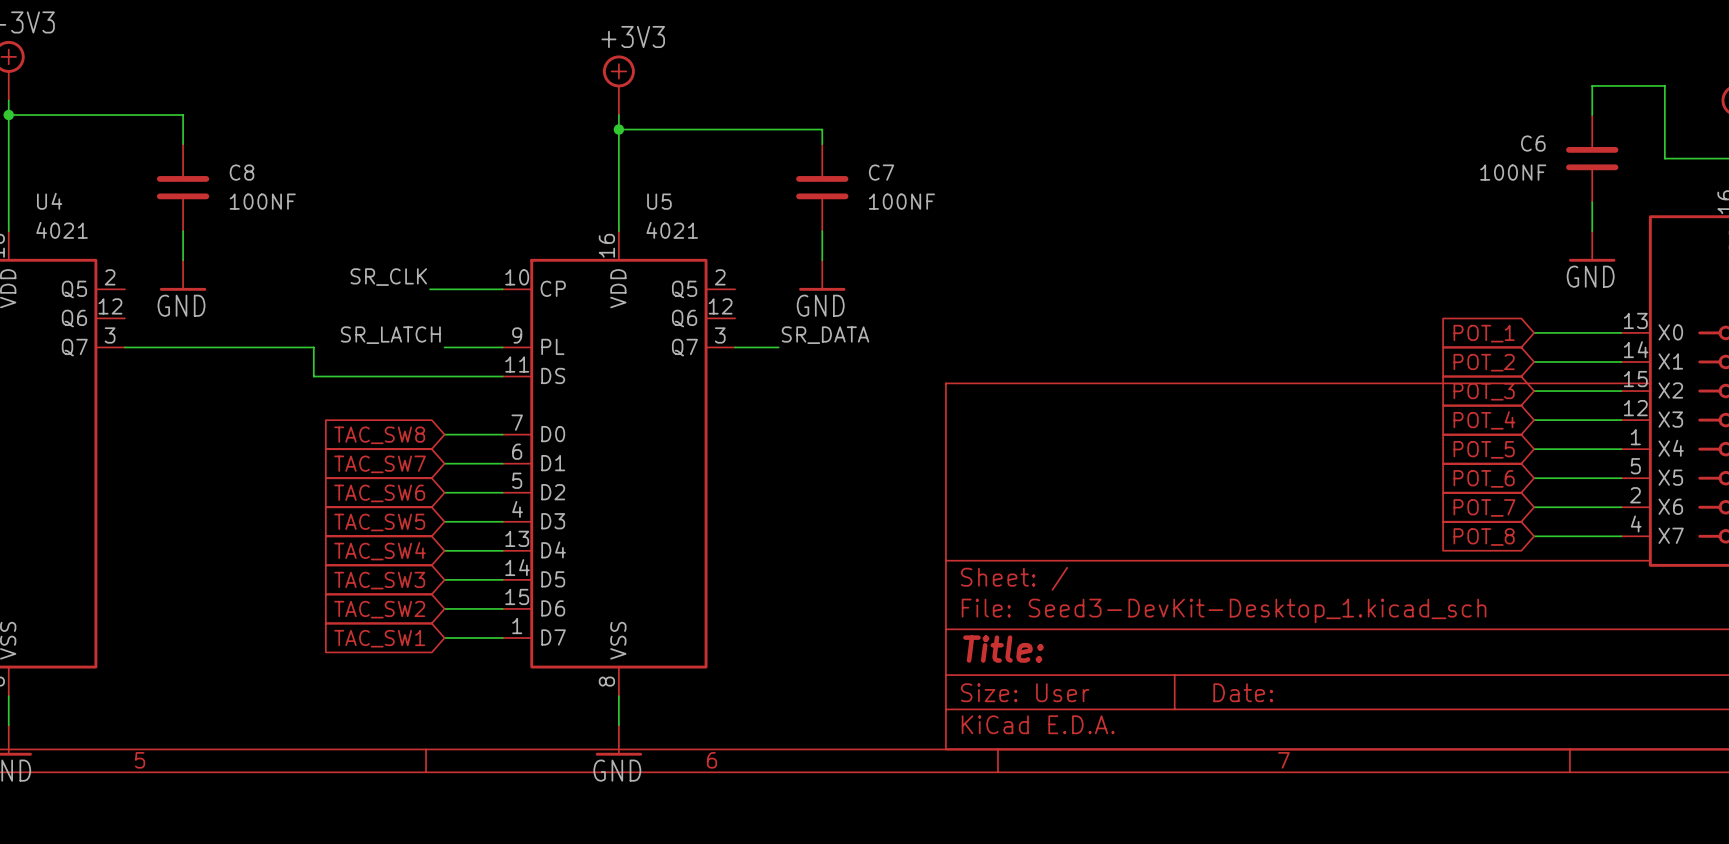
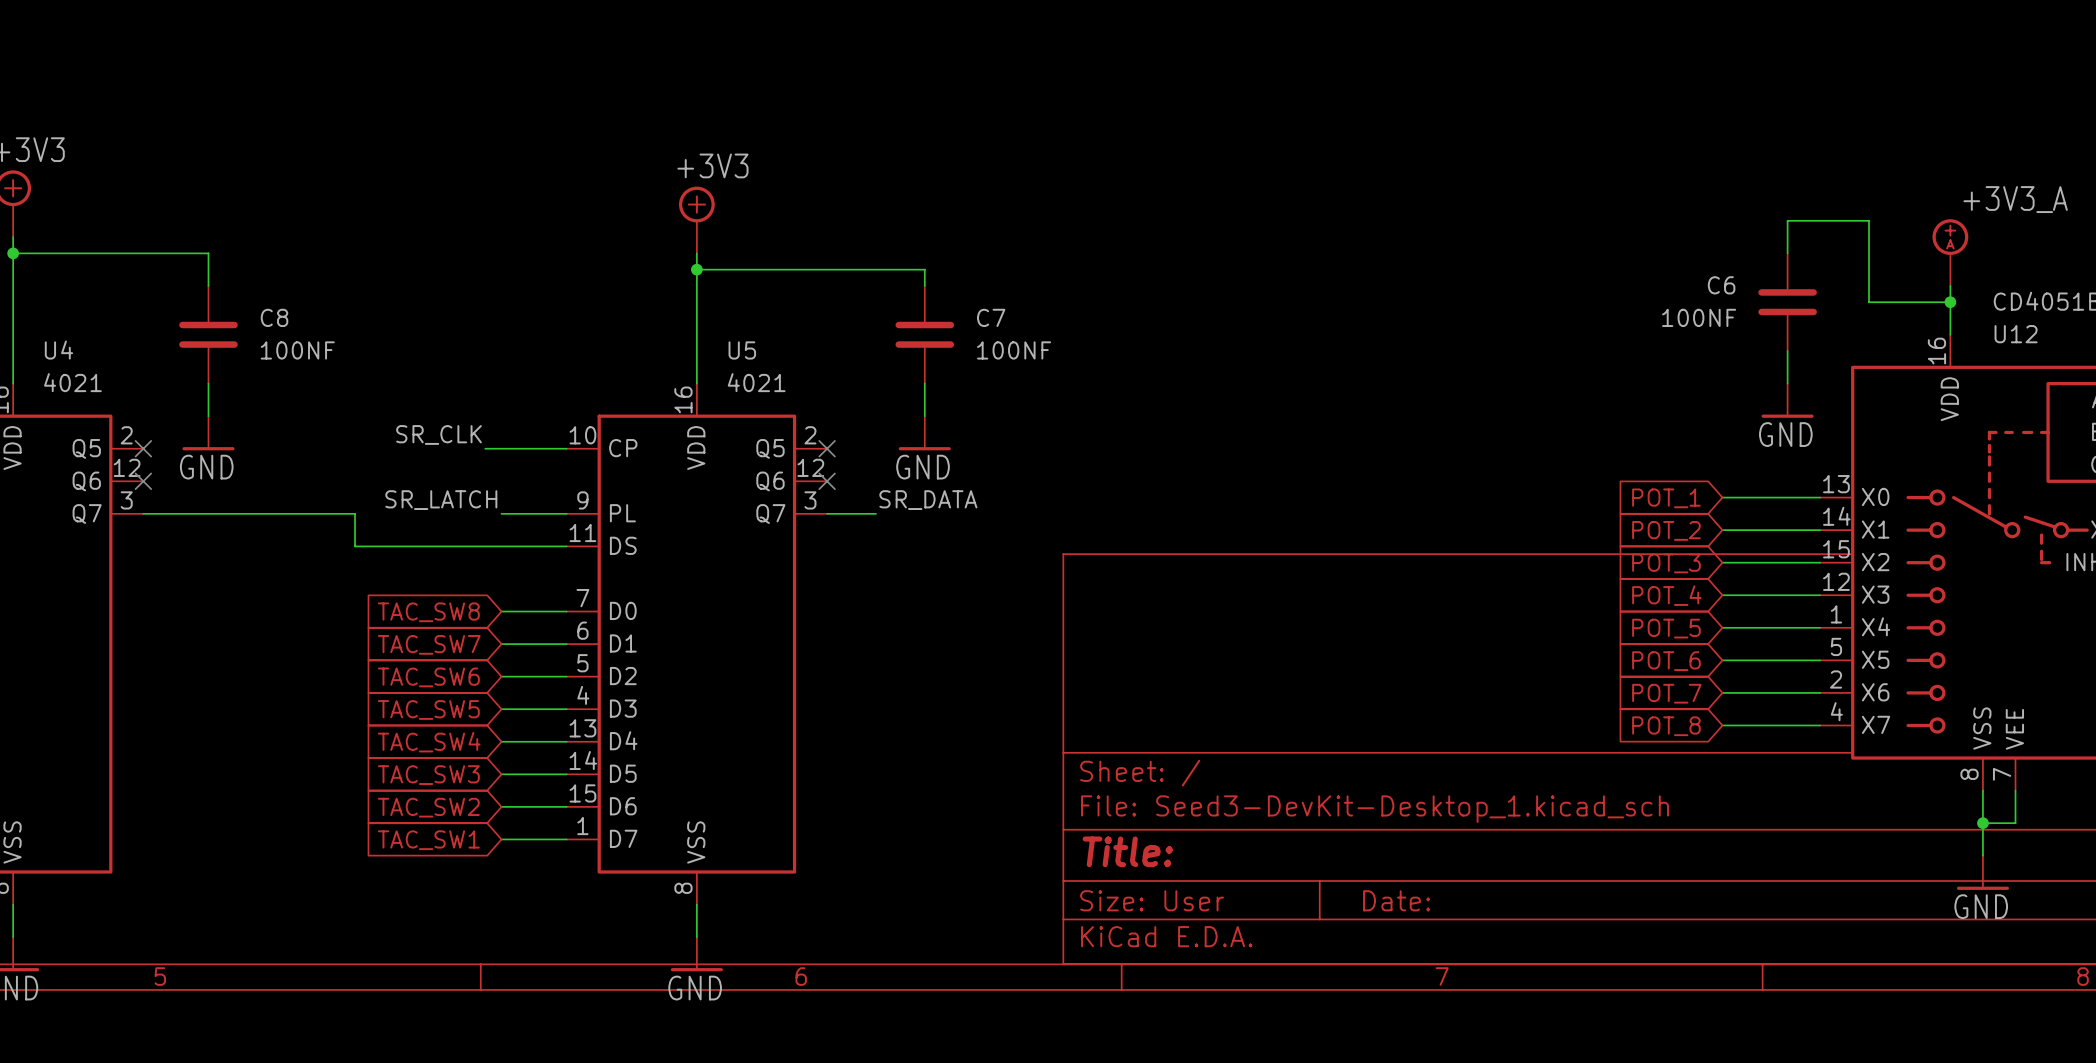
no-connect mark: none -> (143, 448)
no-connect mark: none -> (827, 448)
no-connect mark: none -> (143, 481)
no-connect mark: none -> (827, 481)

